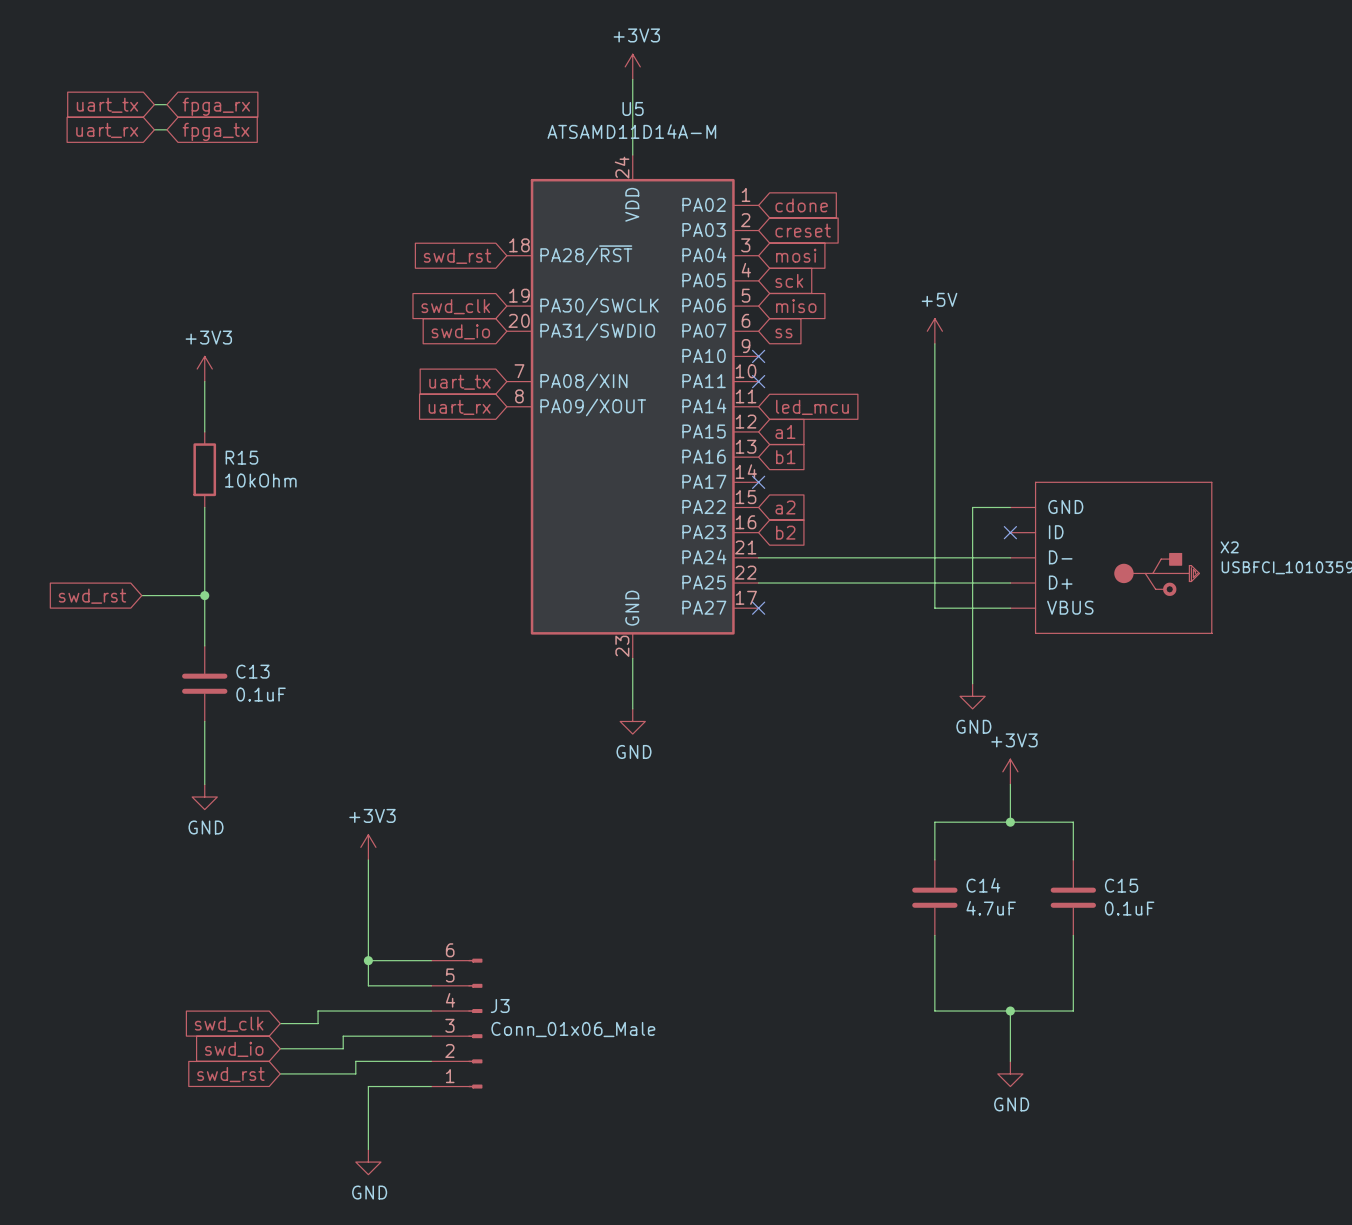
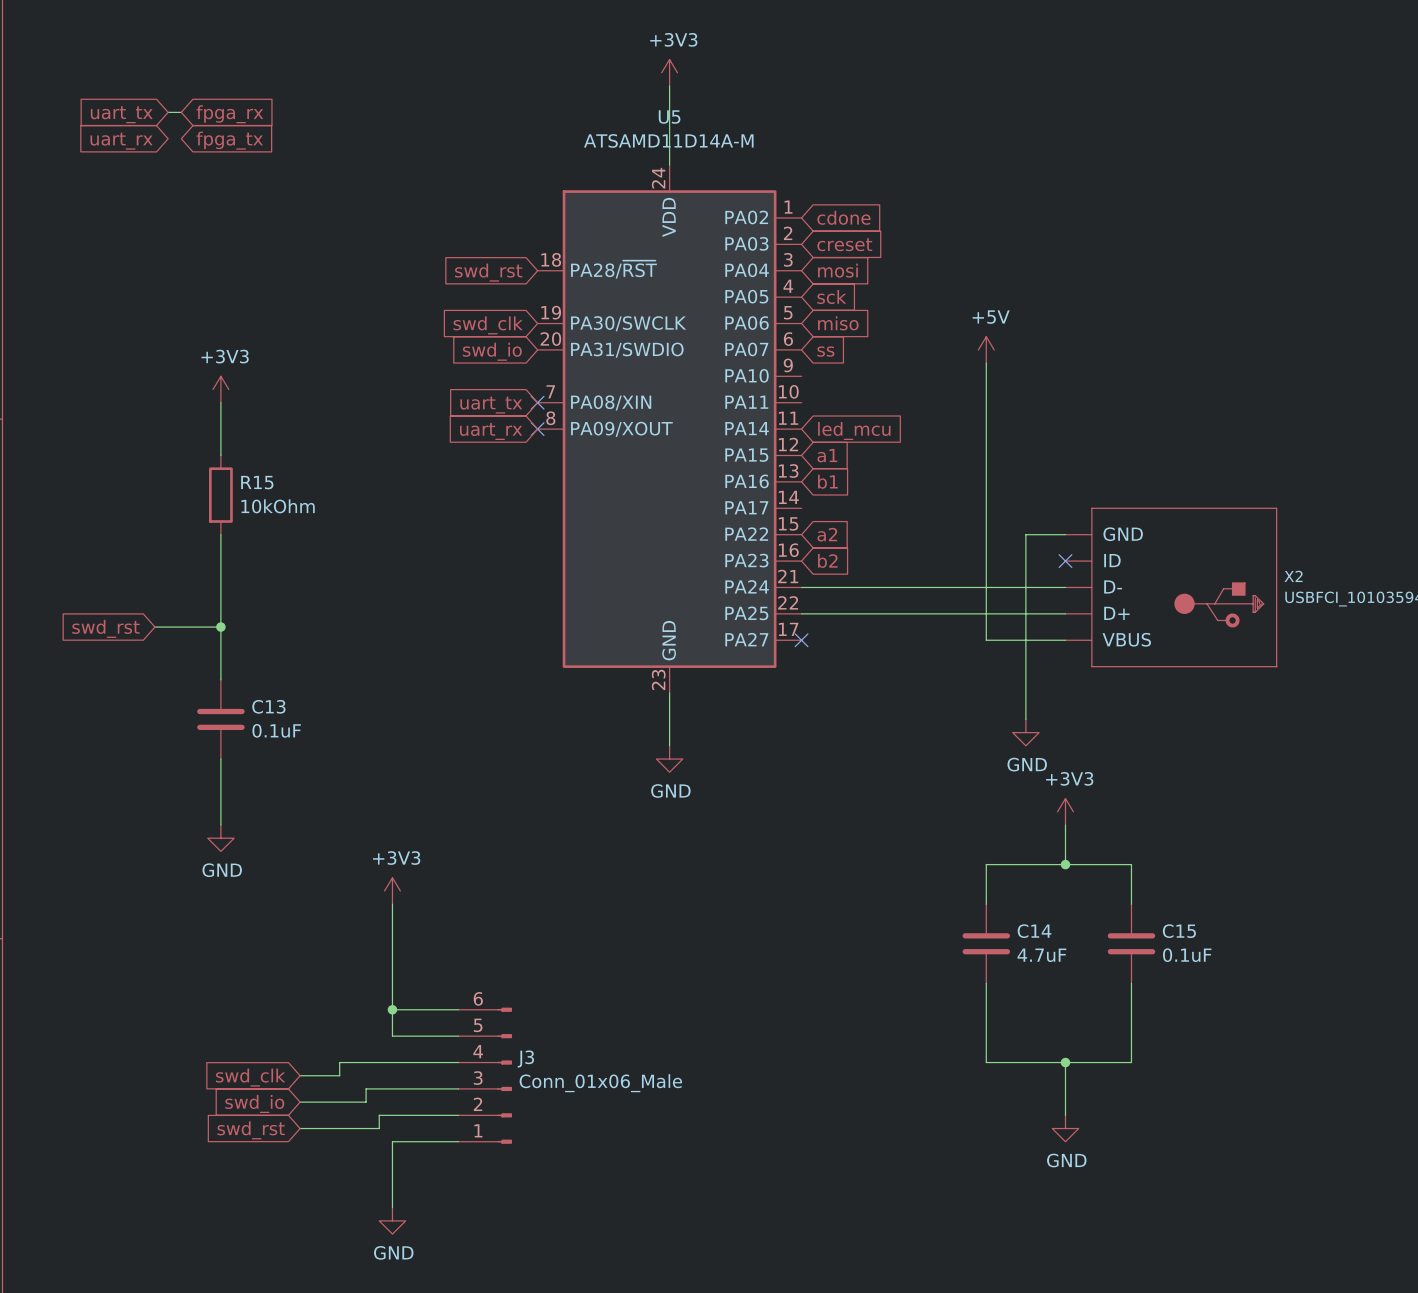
wire: (154, 129) (166, 129) -> none
no-connect mark: (758, 356) -> none
no-connect mark: none -> (537, 402)
no-connect mark: (758, 381) -> none
no-connect mark: none -> (537, 429)
no-connect mark: (758, 482) -> none

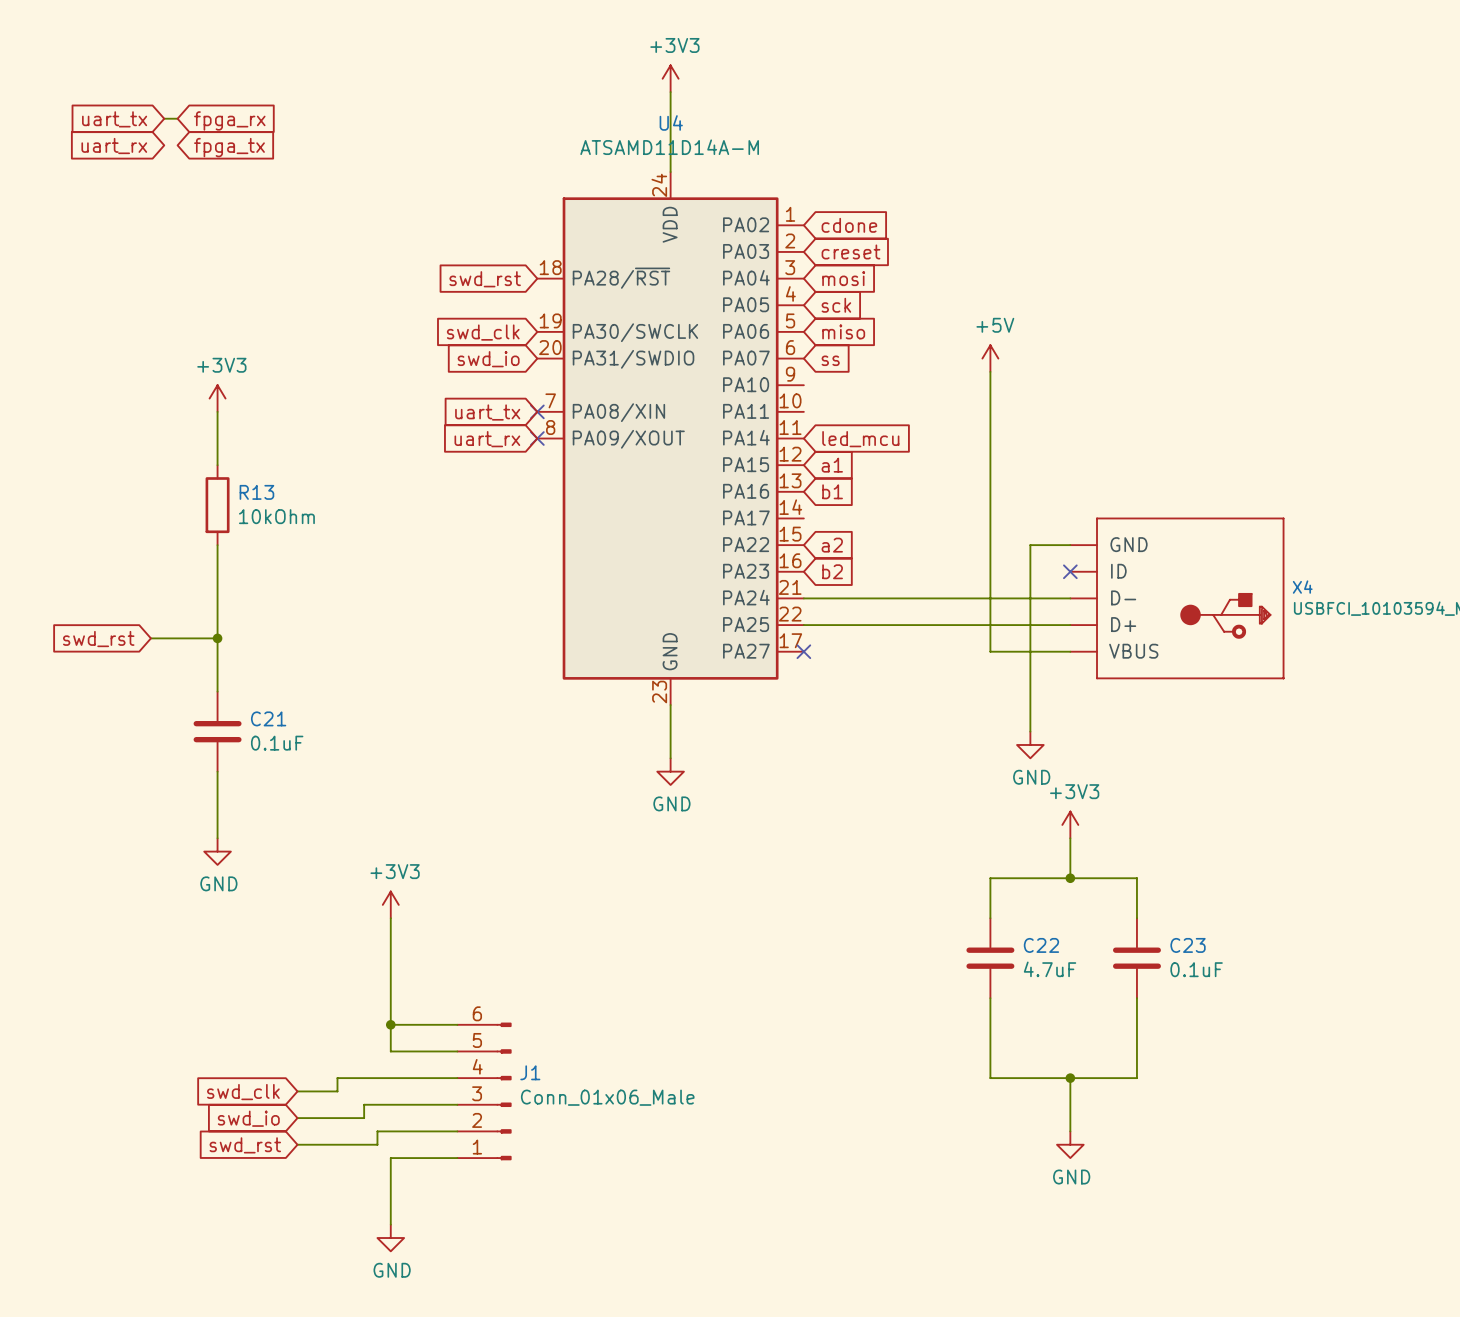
U5 name: U5 (669, 117) -> U4 (671, 122)
R15 name: R15 (257, 482) -> R13 (256, 492)
X2 name: X2 (1293, 576) -> X4 (1302, 587)
C13 name: C13 (268, 706) -> C21 (268, 718)
C14 name: C14 (1034, 931) -> C22 (1041, 945)
C15 name: C15 (1179, 931) -> C23 (1188, 945)
J3 name: J3 (525, 1058) -> J1 (530, 1072)

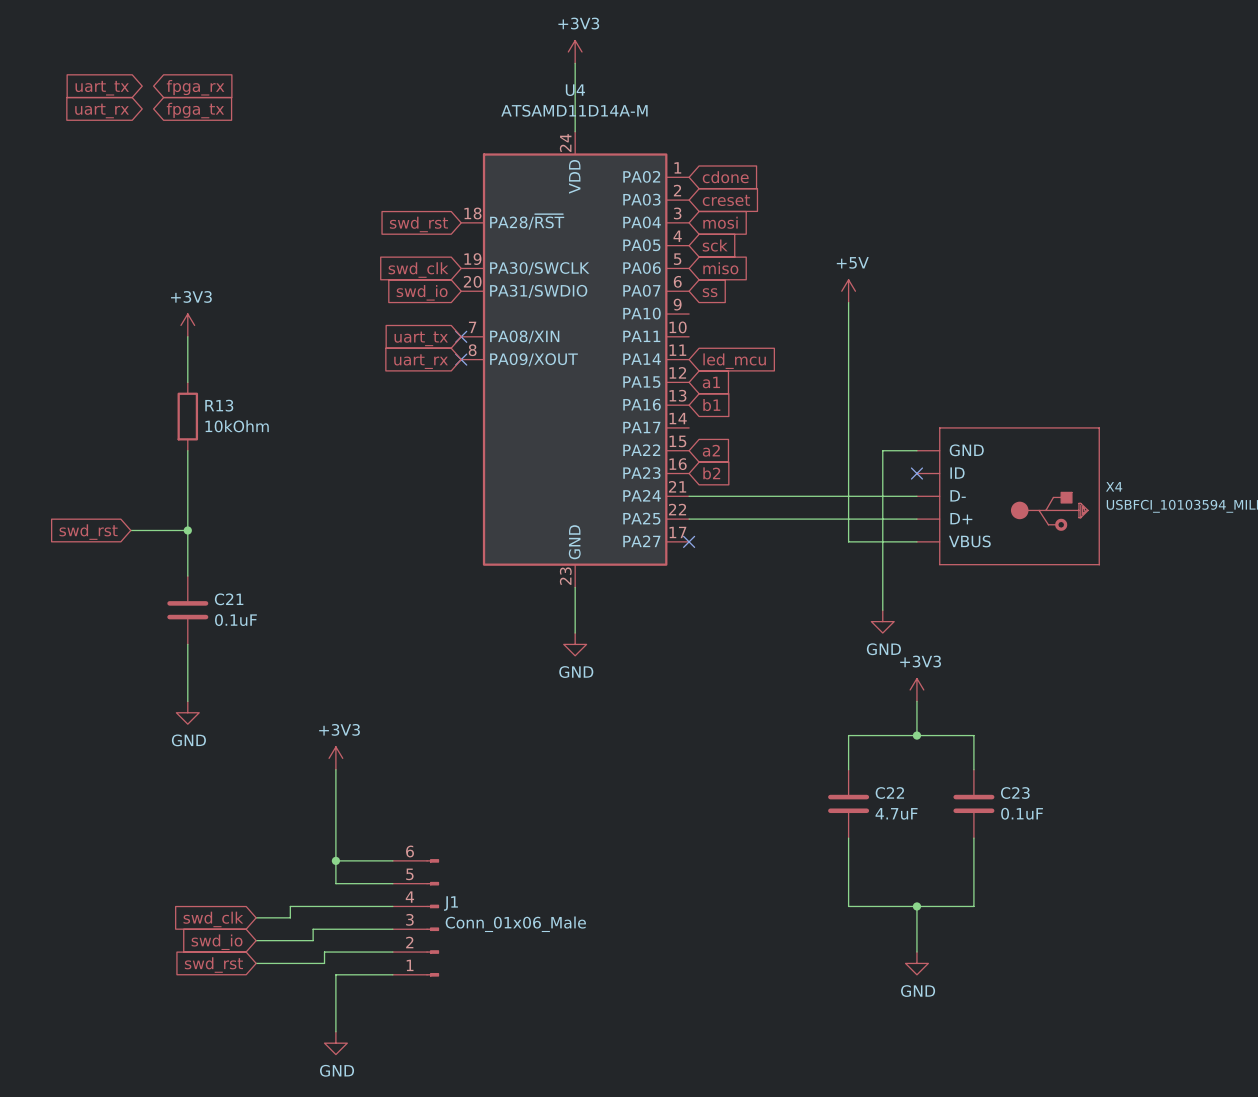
wire: (164, 118) (177, 118) -> none

